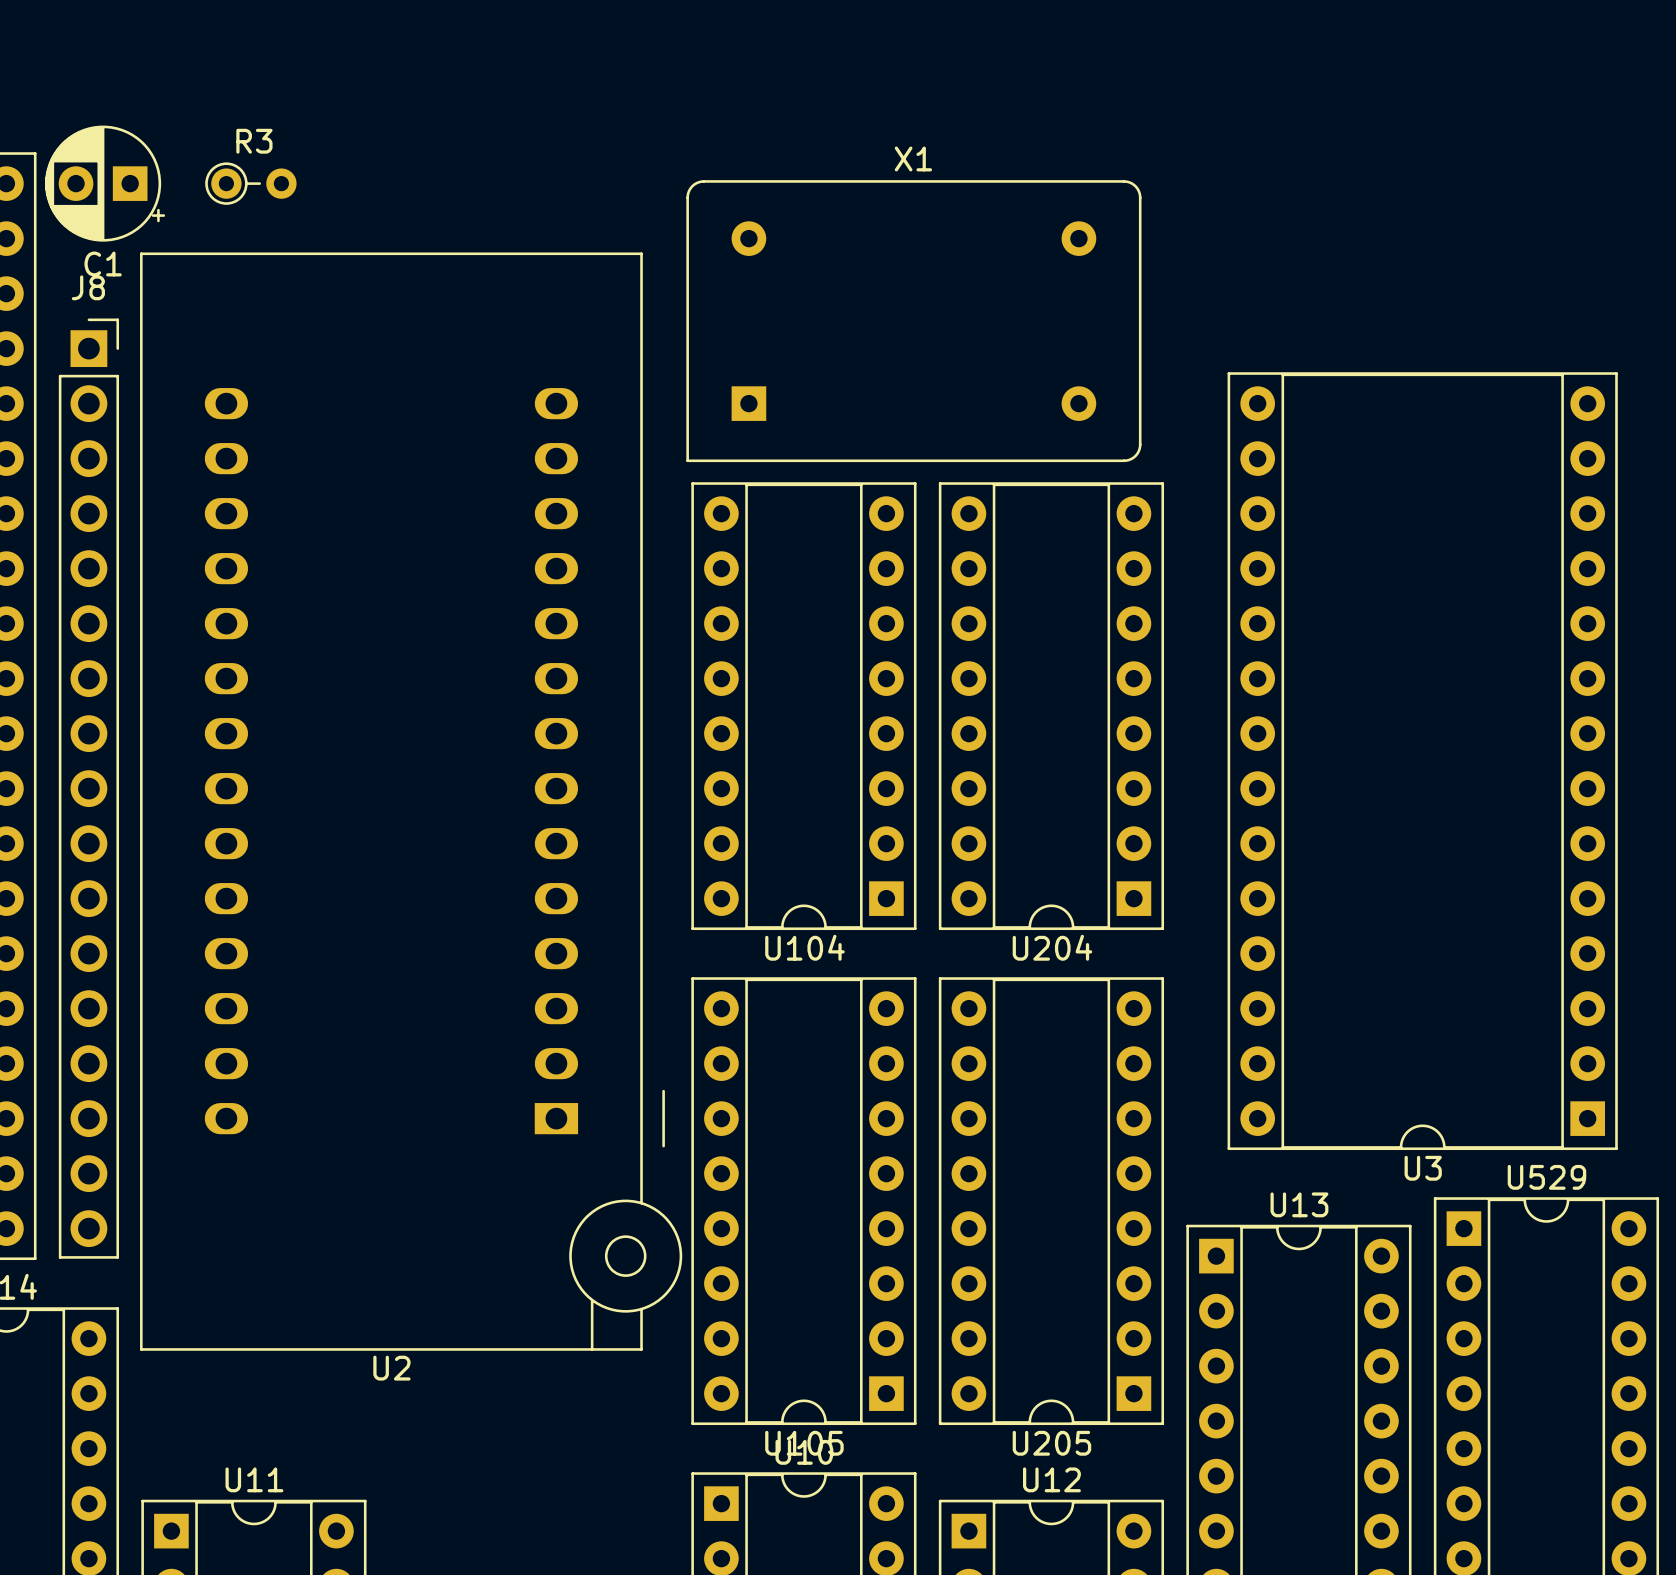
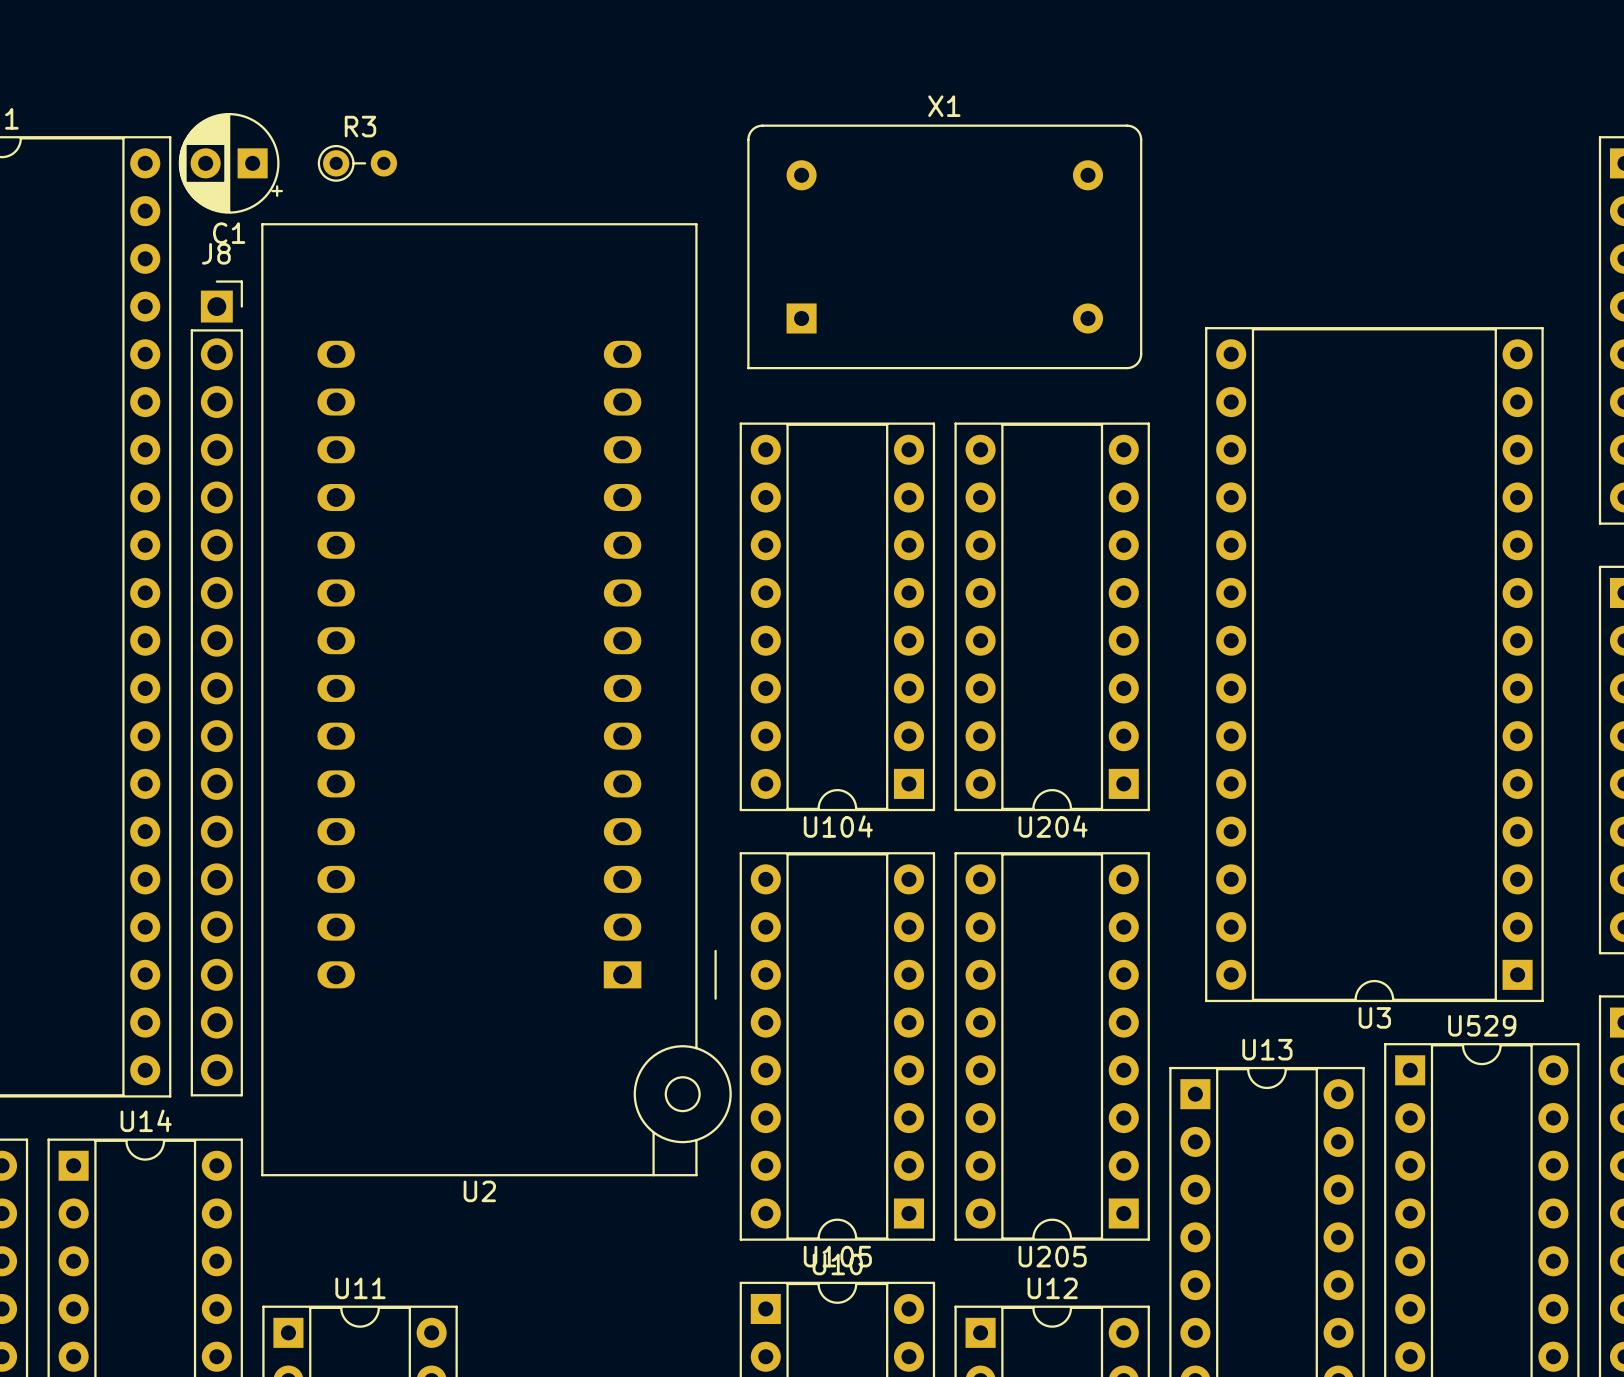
X1 position: (913, 321) -> (944, 246)

